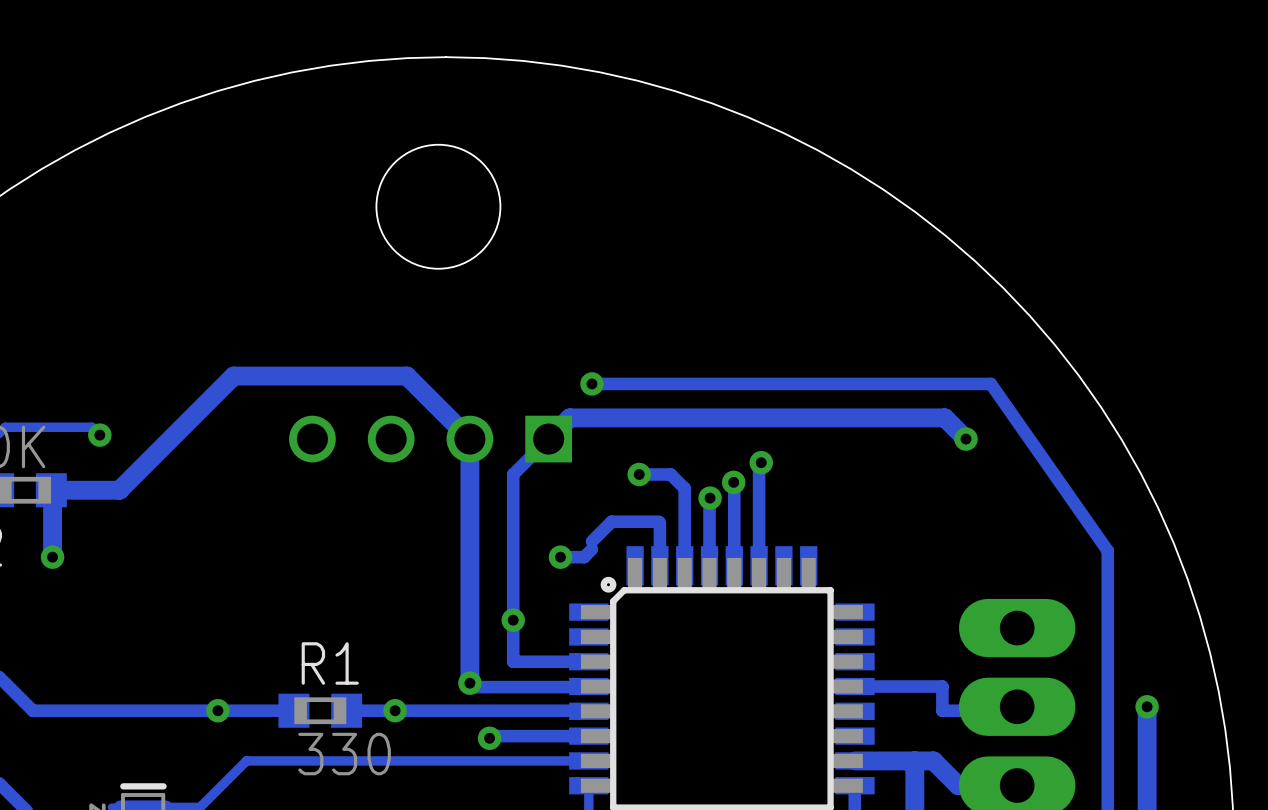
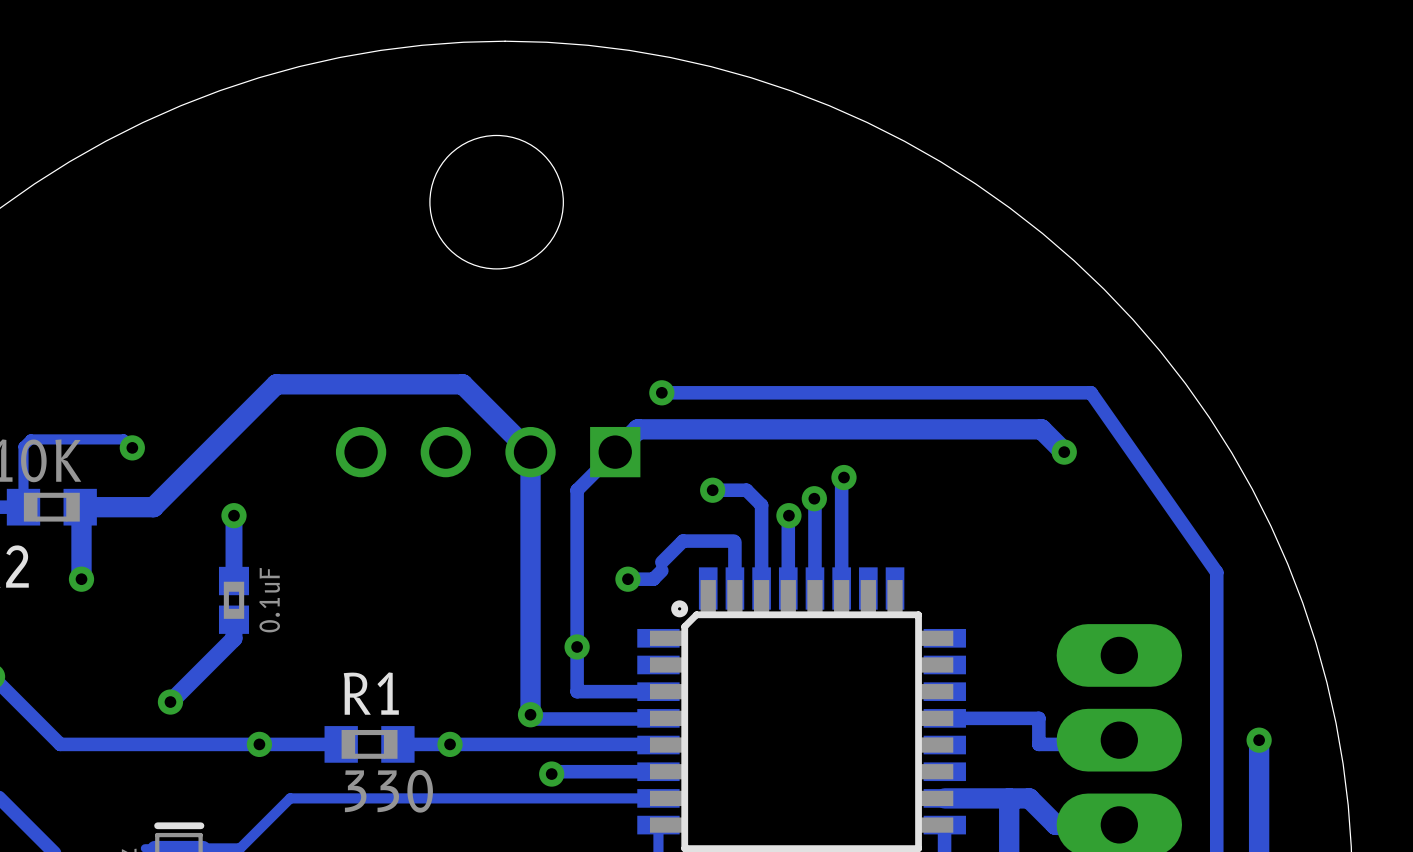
track: none -> (234, 515) (234, 581)
via: none -> (234, 515)
part: none -> 0.1uF (234, 600)
track: none -> (234, 619) (234, 638) (170, 702)
via: none -> (170, 702)

